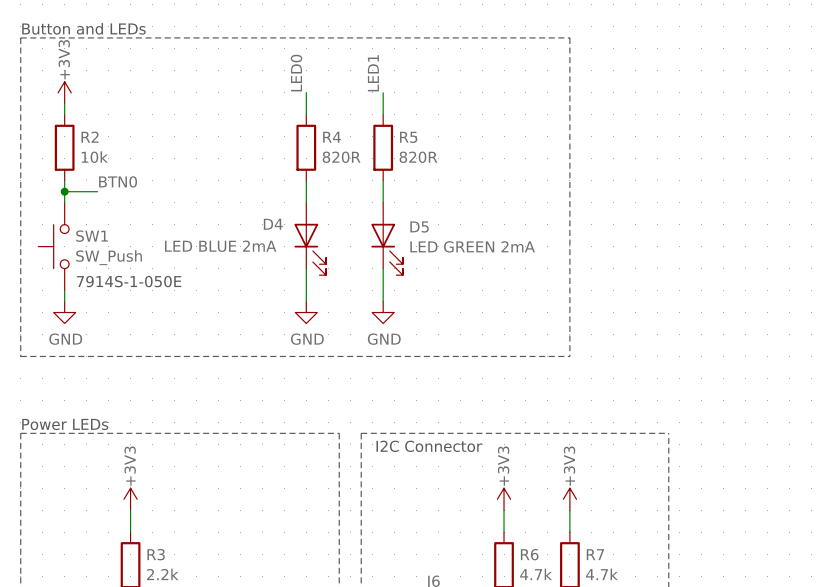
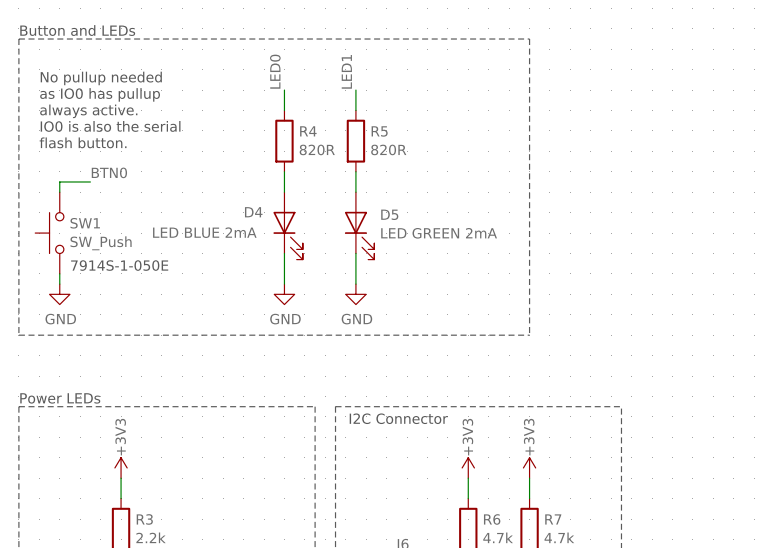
text: none -> No pullup needed (101, 78)
power symbol: +3V3 (64, 92) -> none
text: none -> as IO0 has pullup (100, 94)
wire: (64, 103) (64, 114) -> none
text: none -> always active. (88, 111)
text: none -> IO0 is also the serial (110, 126)
R2: 10k (64, 147) -> none
text: none -> flash button. (83, 142)
wire: (64, 180) (64, 191) -> none
junction: (64, 191) -> none

